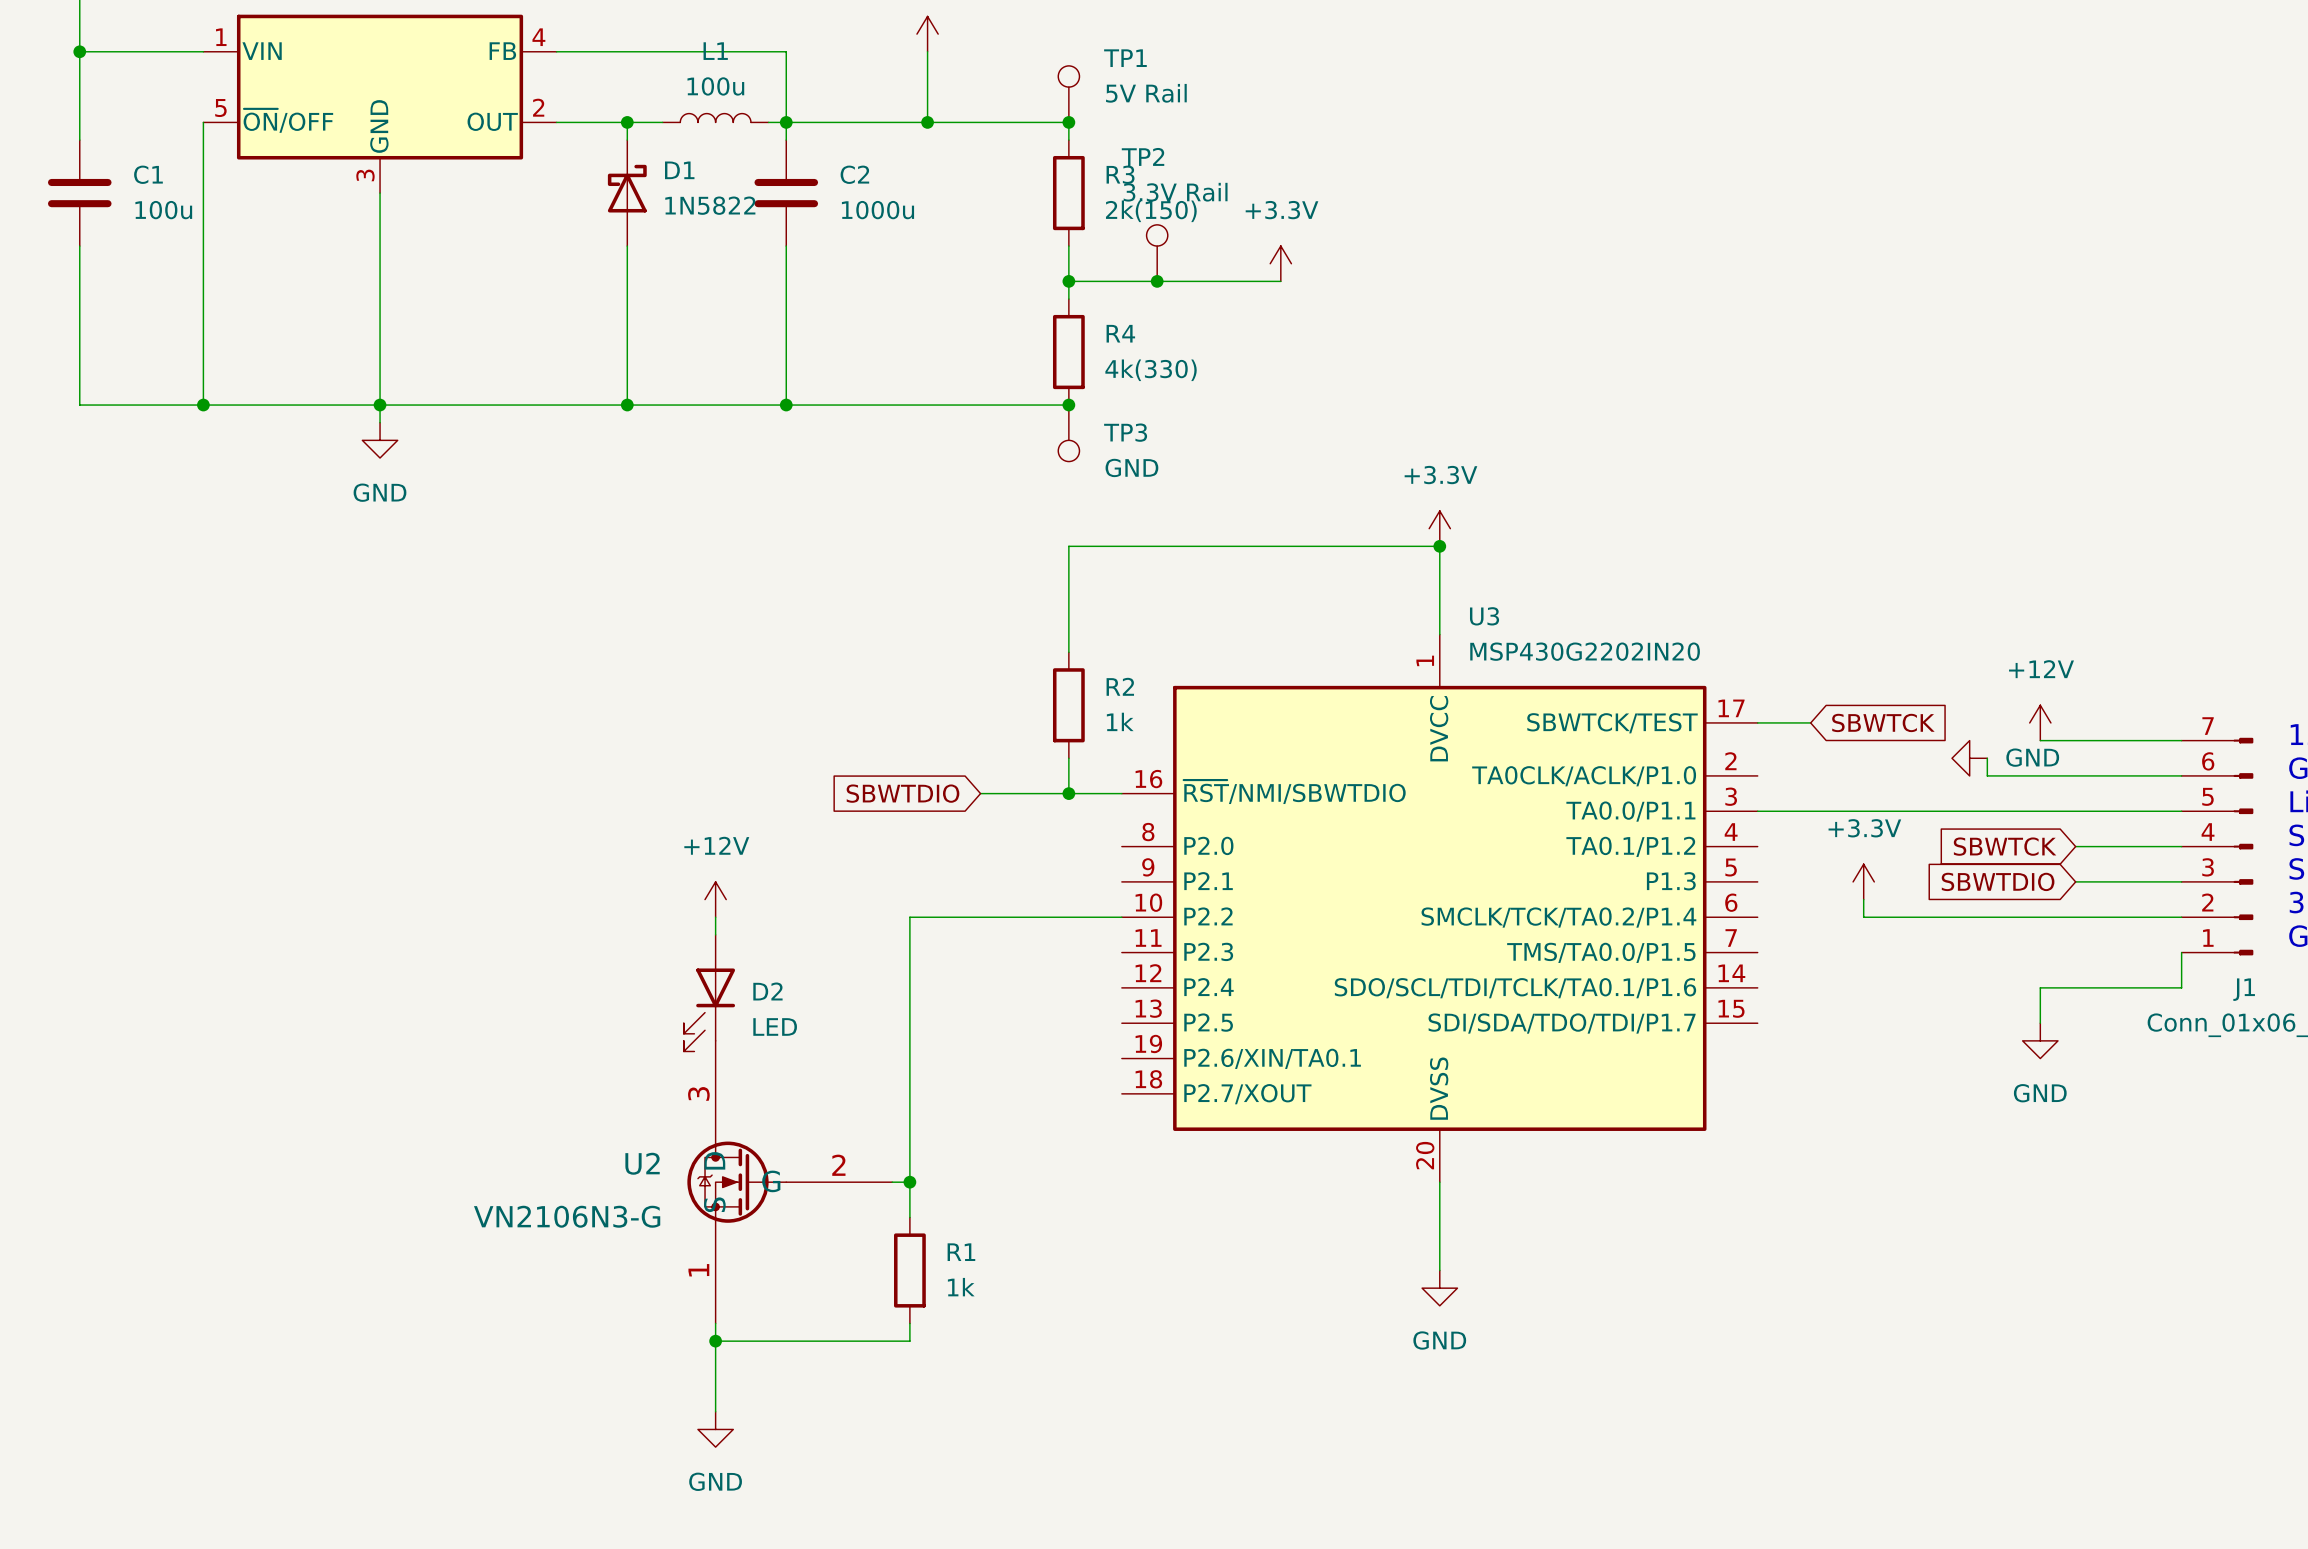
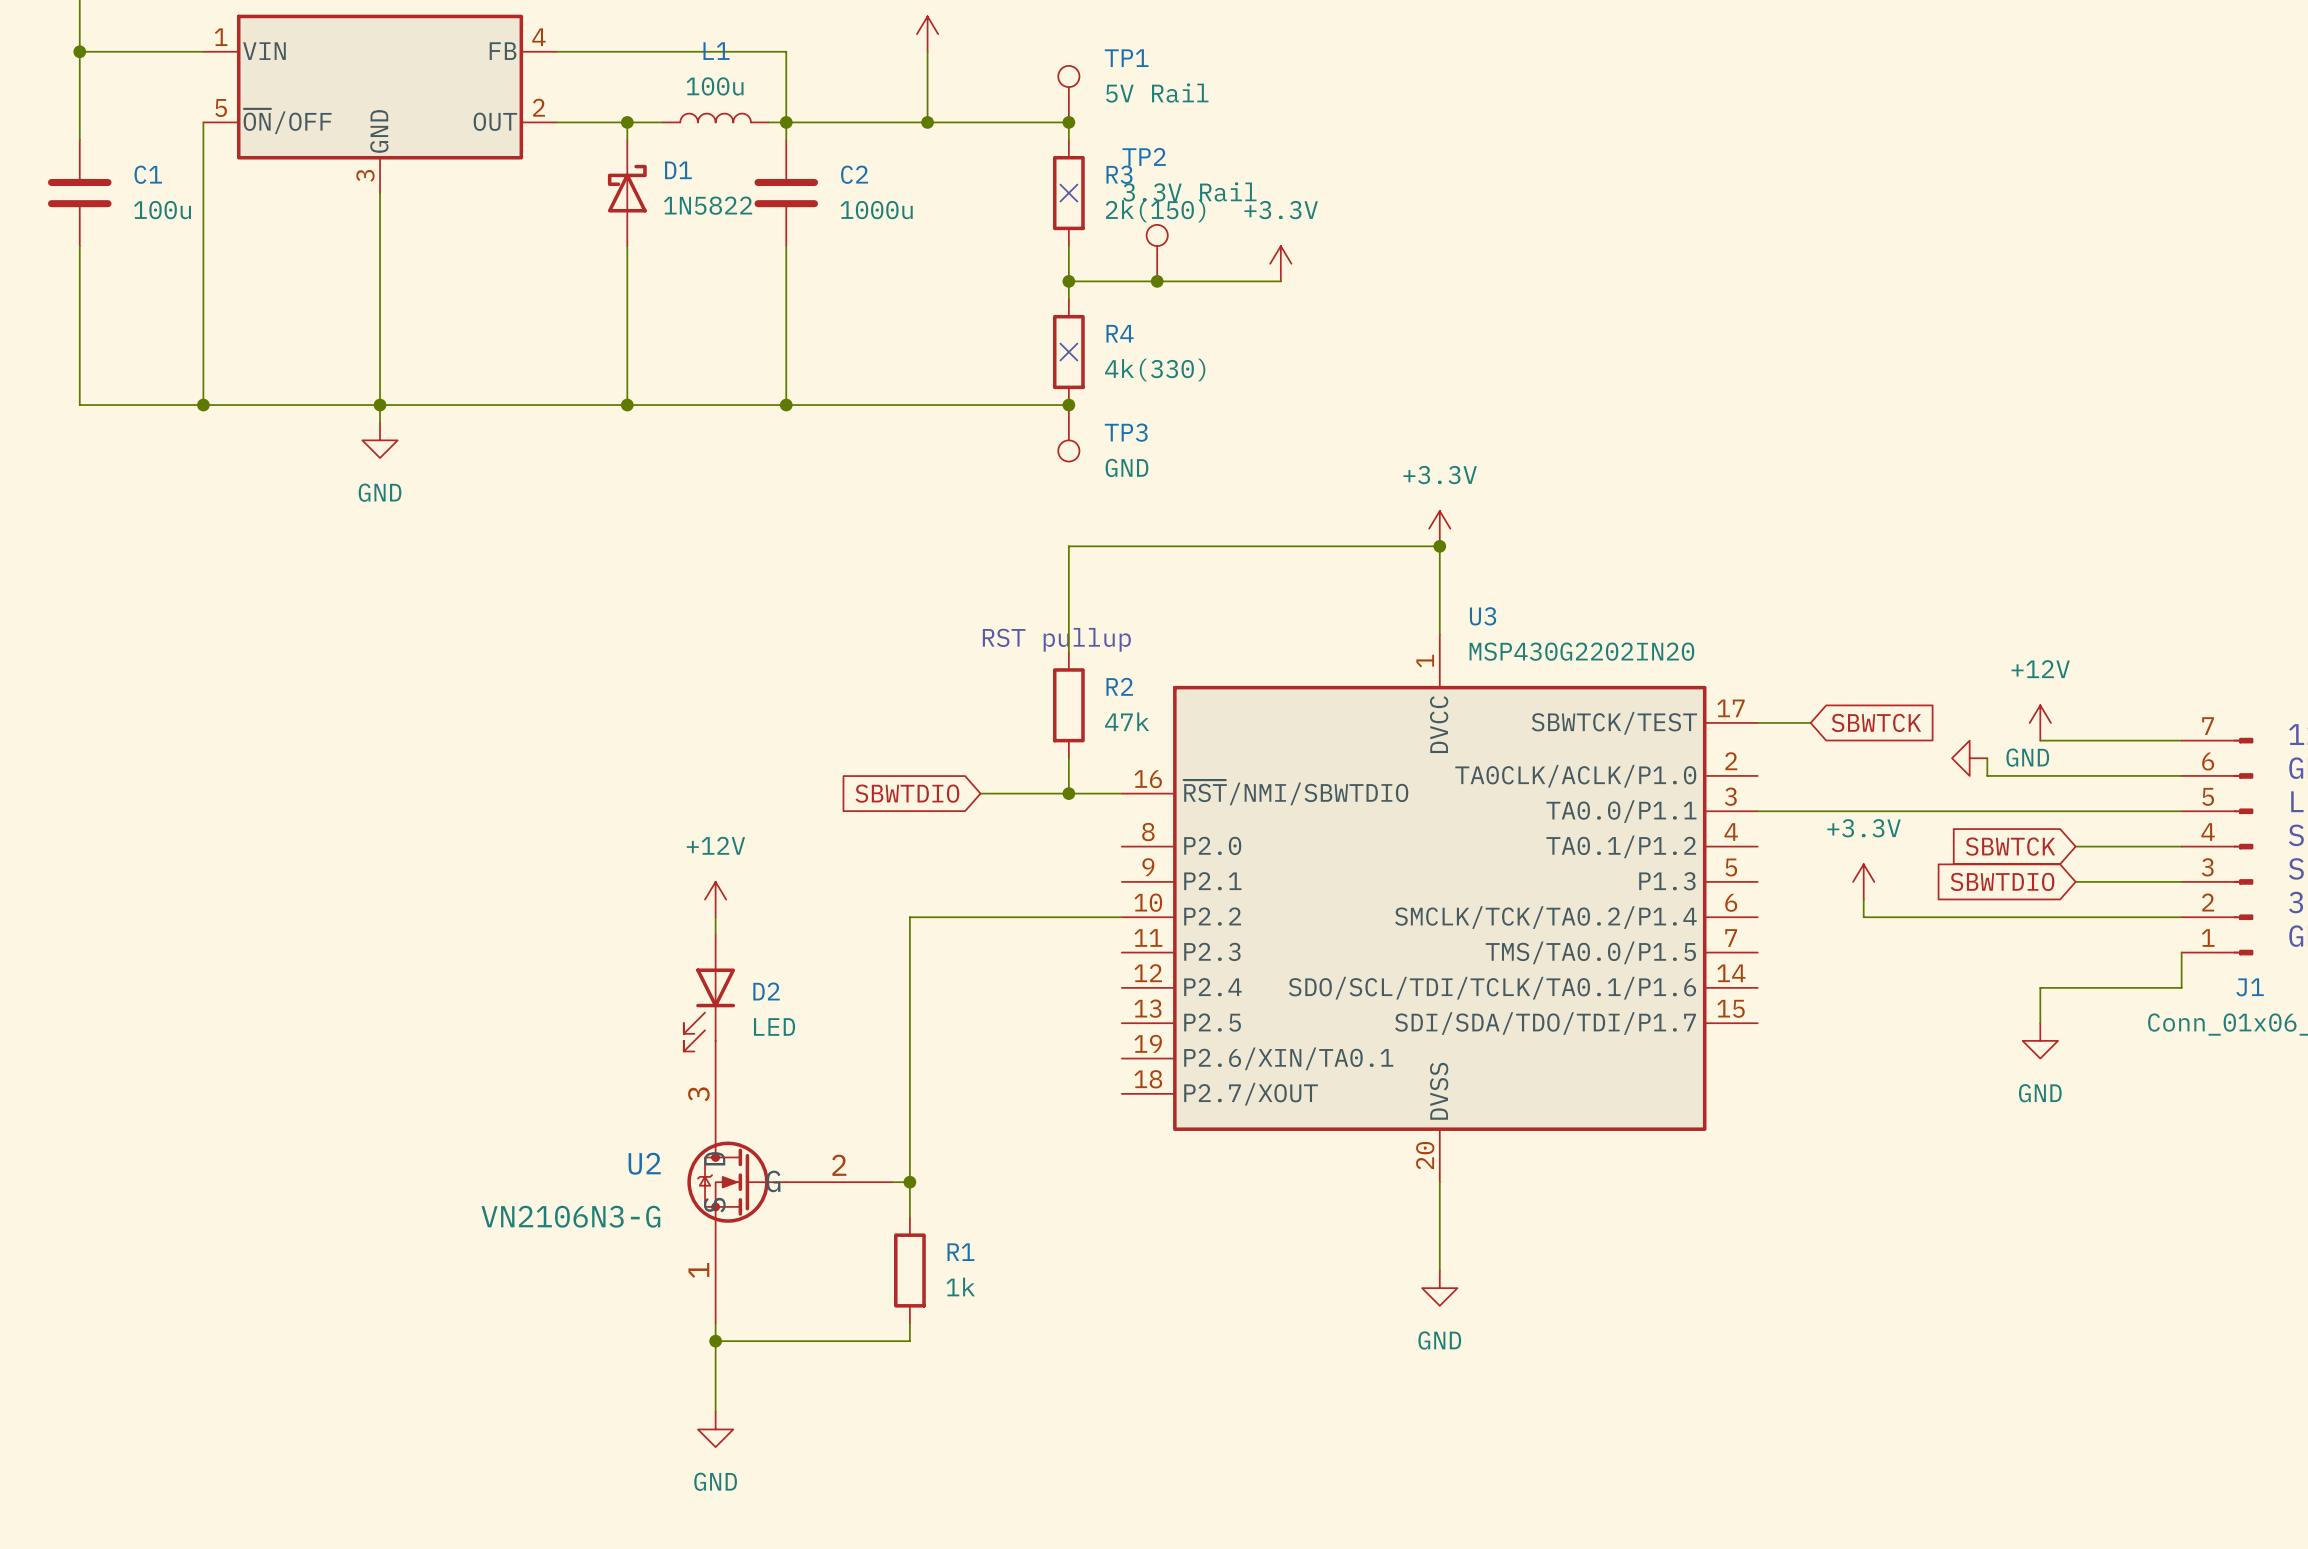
no-connect mark: none -> (1068, 193)
no-connect mark: none -> (1068, 352)
text: none -> RST pullup (1056, 639)
R2 value: 1k (1120, 721) -> 47k (1127, 721)

